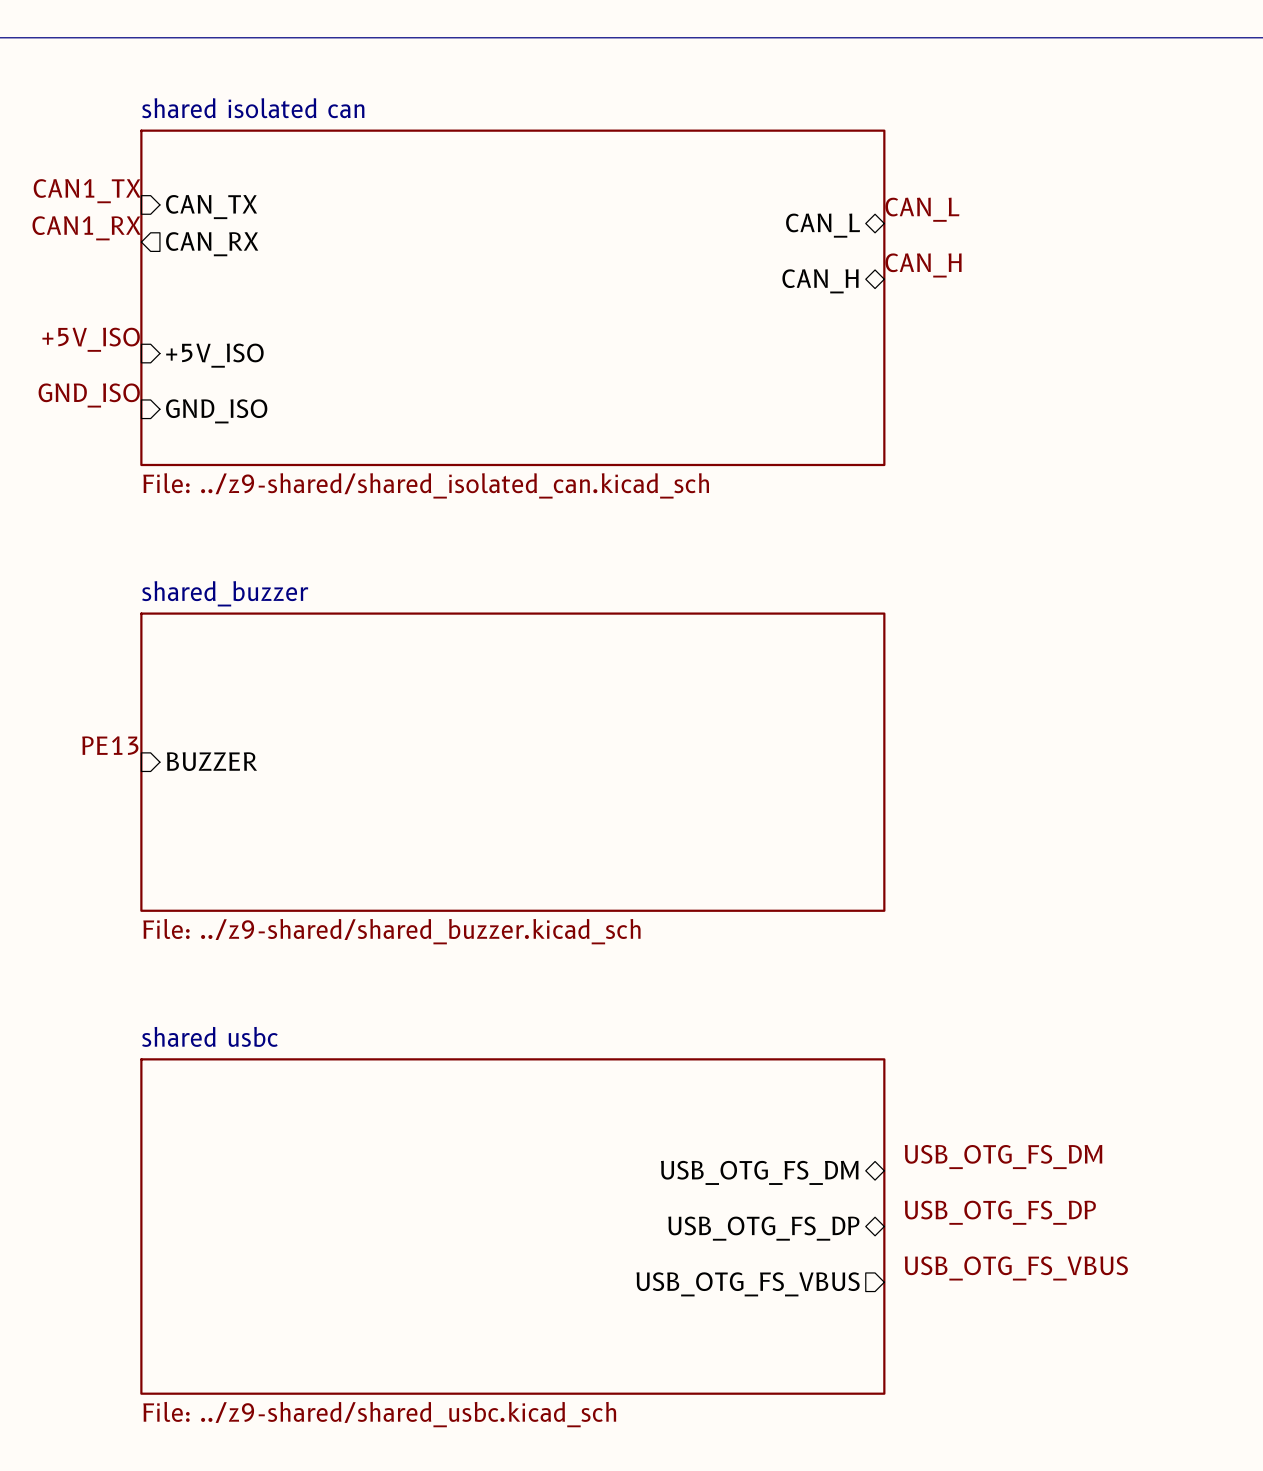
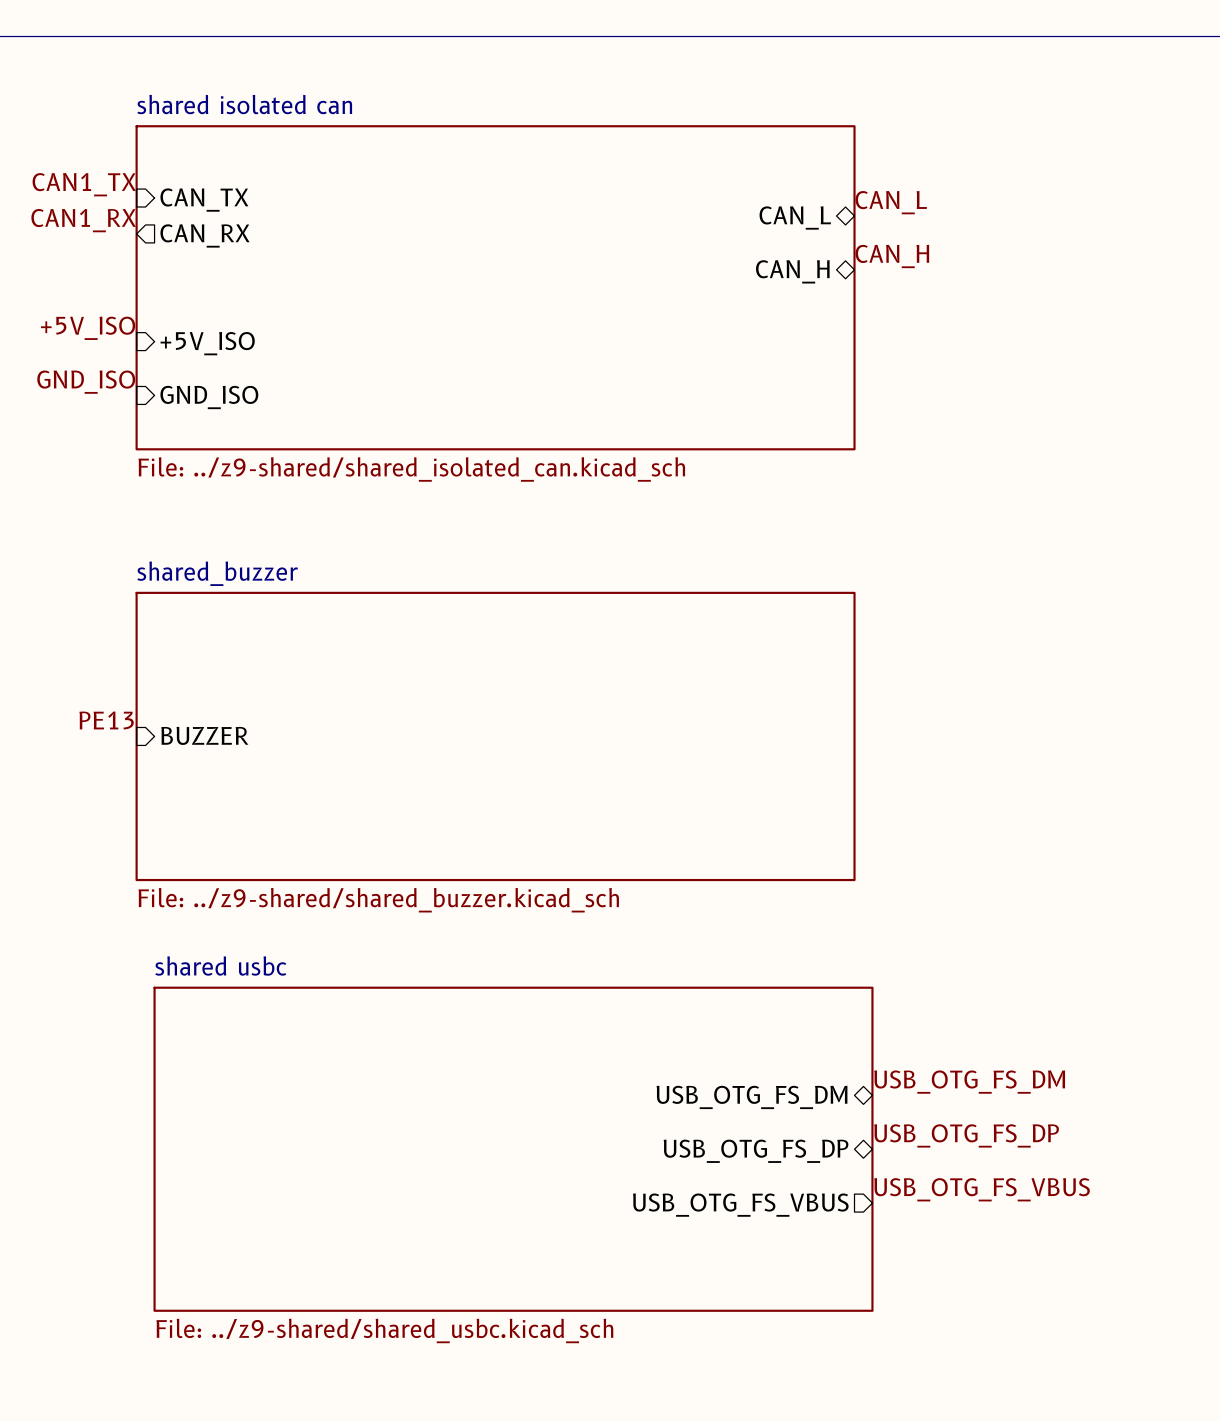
label position: USB_OTG_FS_DM (1003, 1157) -> USB_OTG_FS_DM (969, 1082)
sheet pin position: USB_OTG_FS_DM (759, 1172) -> USB_OTG_FS_DM (752, 1097)
label position: USB_OTG_FS_DP (1000, 1212) -> USB_OTG_FS_DP (966, 1135)
sheet shared usbc position: (512, 1226) -> (513, 1149)
sheet pin position: USB_OTG_FS_DP (763, 1228) -> USB_OTG_FS_DP (756, 1151)
label position: USB_OTG_FS_VBUS (1016, 1268) -> USB_OTG_FS_VBUS (982, 1189)
sheet pin position: USB_OTG_FS_VBUS (748, 1284) -> USB_OTG_FS_VBUS (740, 1205)

